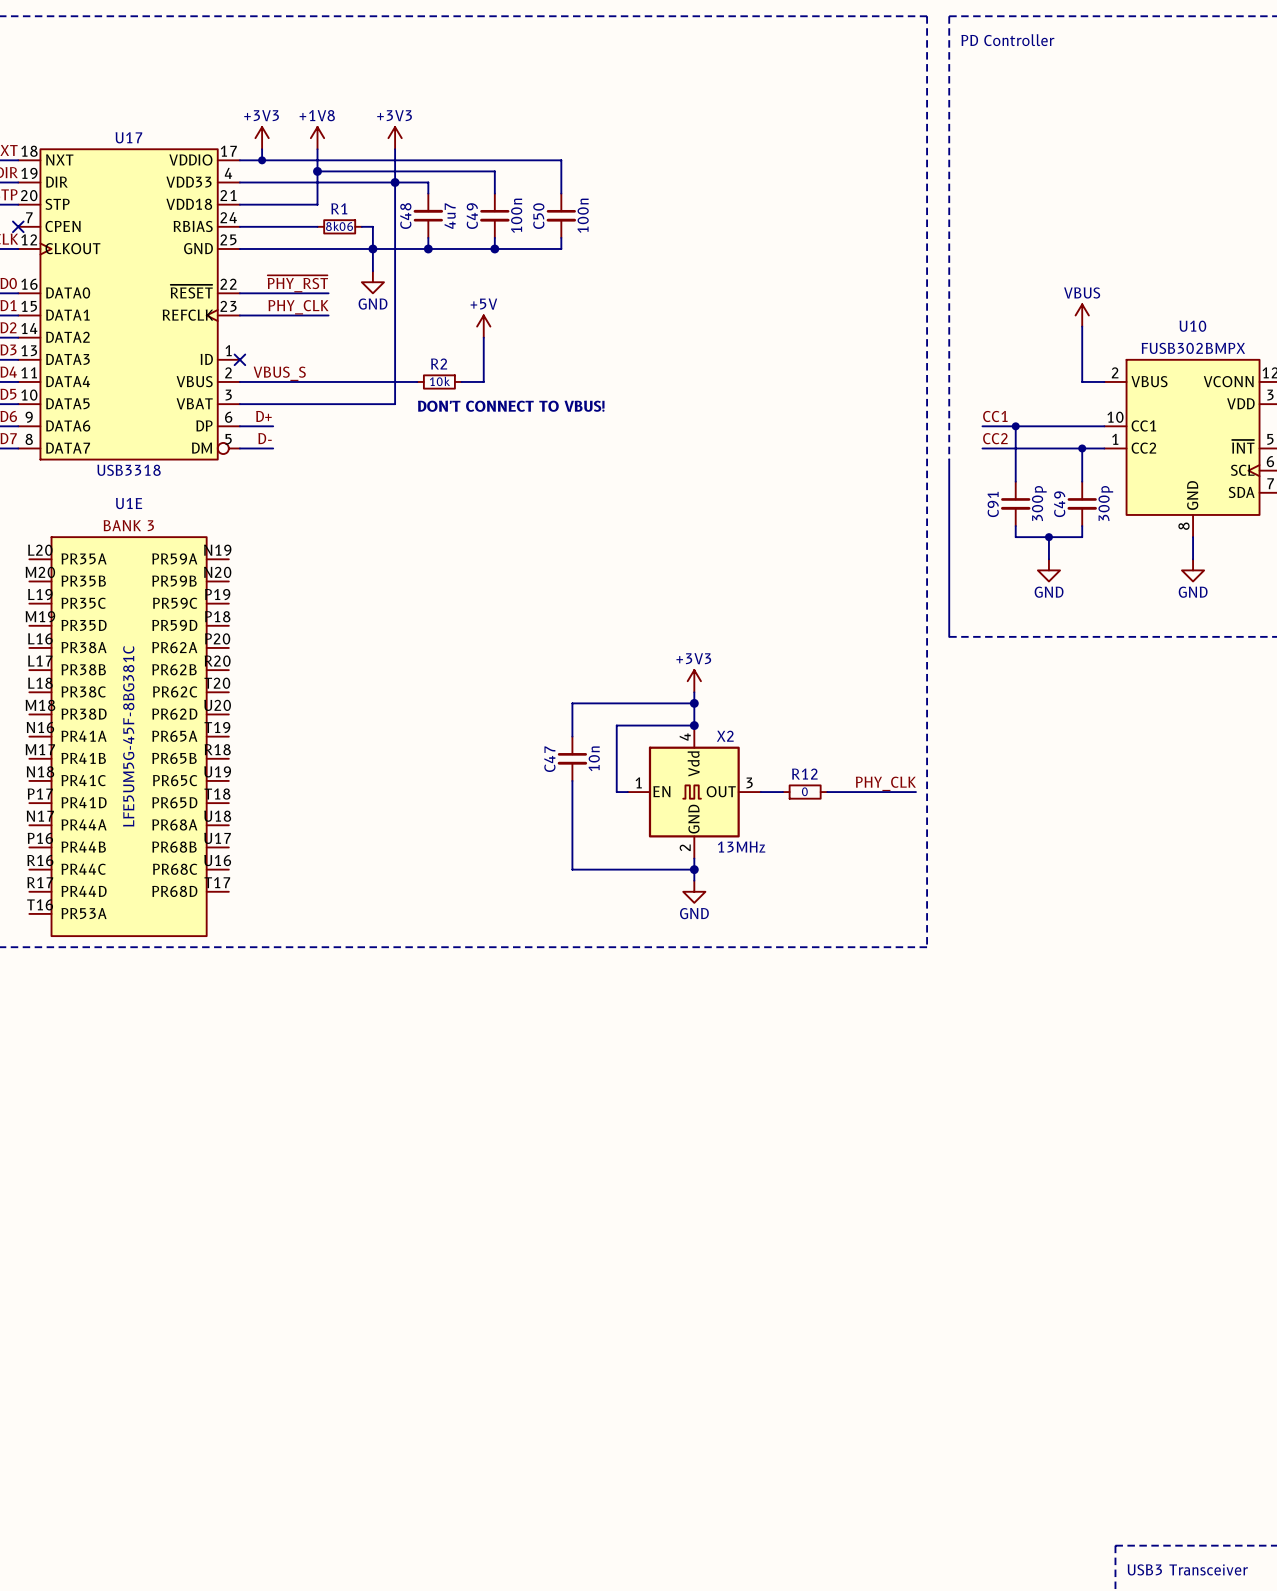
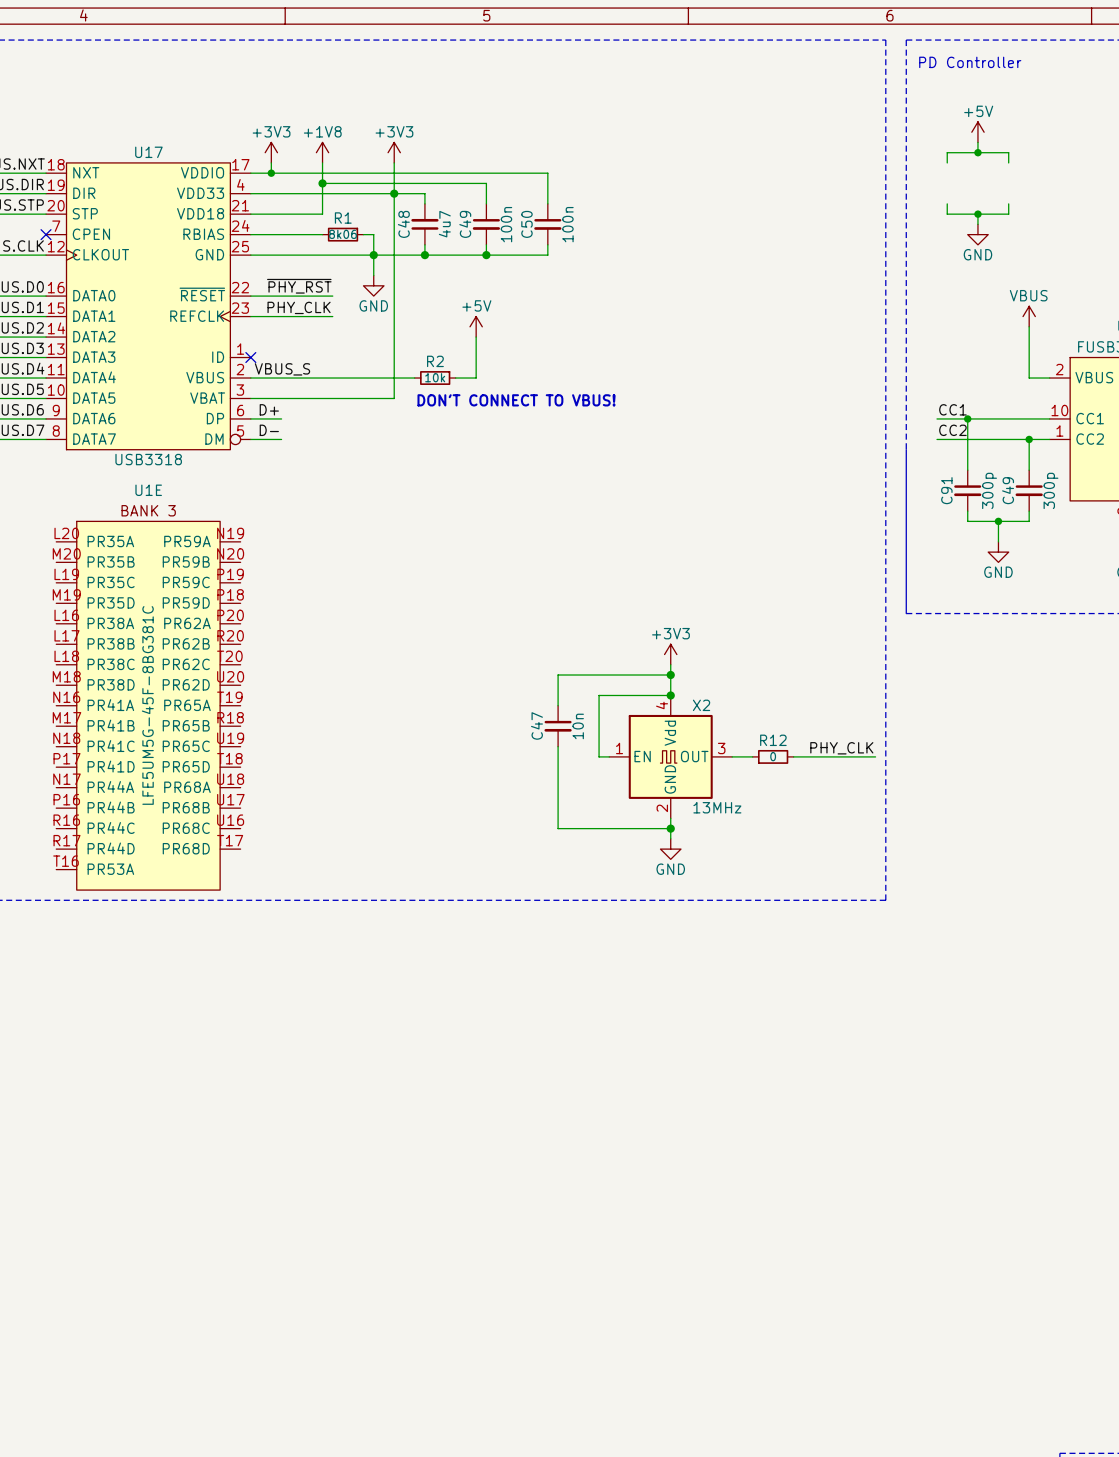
power symbol: none -> +5V (977, 132)
wire: none -> (977, 142) (977, 152)
junction: none -> (977, 152)
wire: none -> (947, 162) (947, 152) (1008, 152) (1008, 162)
wire: none -> (947, 203) (947, 214) (1008, 214) (1008, 203)
wire: none -> (977, 214) (977, 224)
junction: none -> (977, 214)
power symbol: none -> GND (977, 234)

